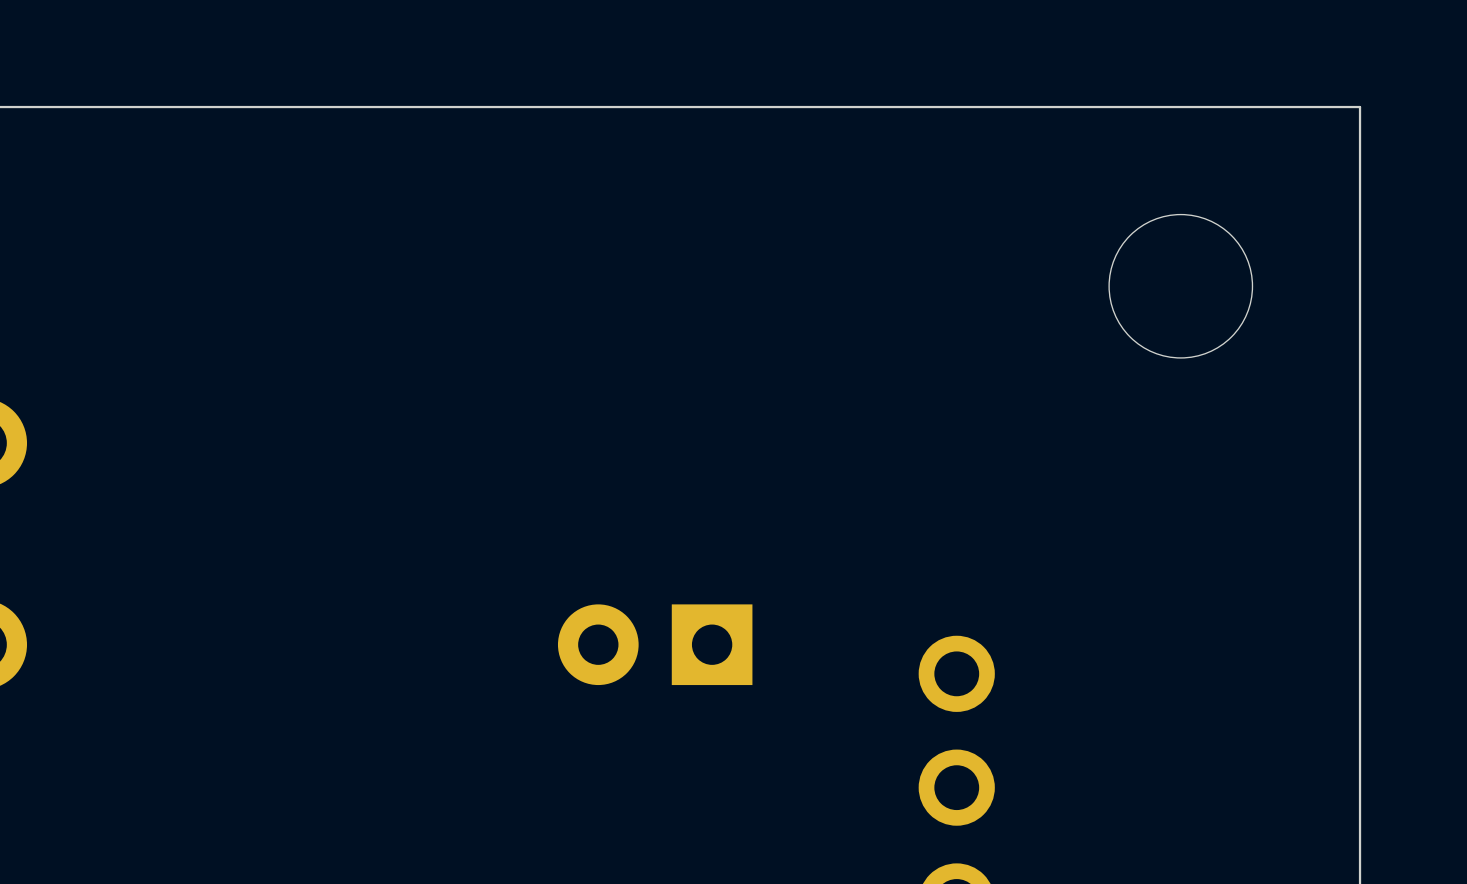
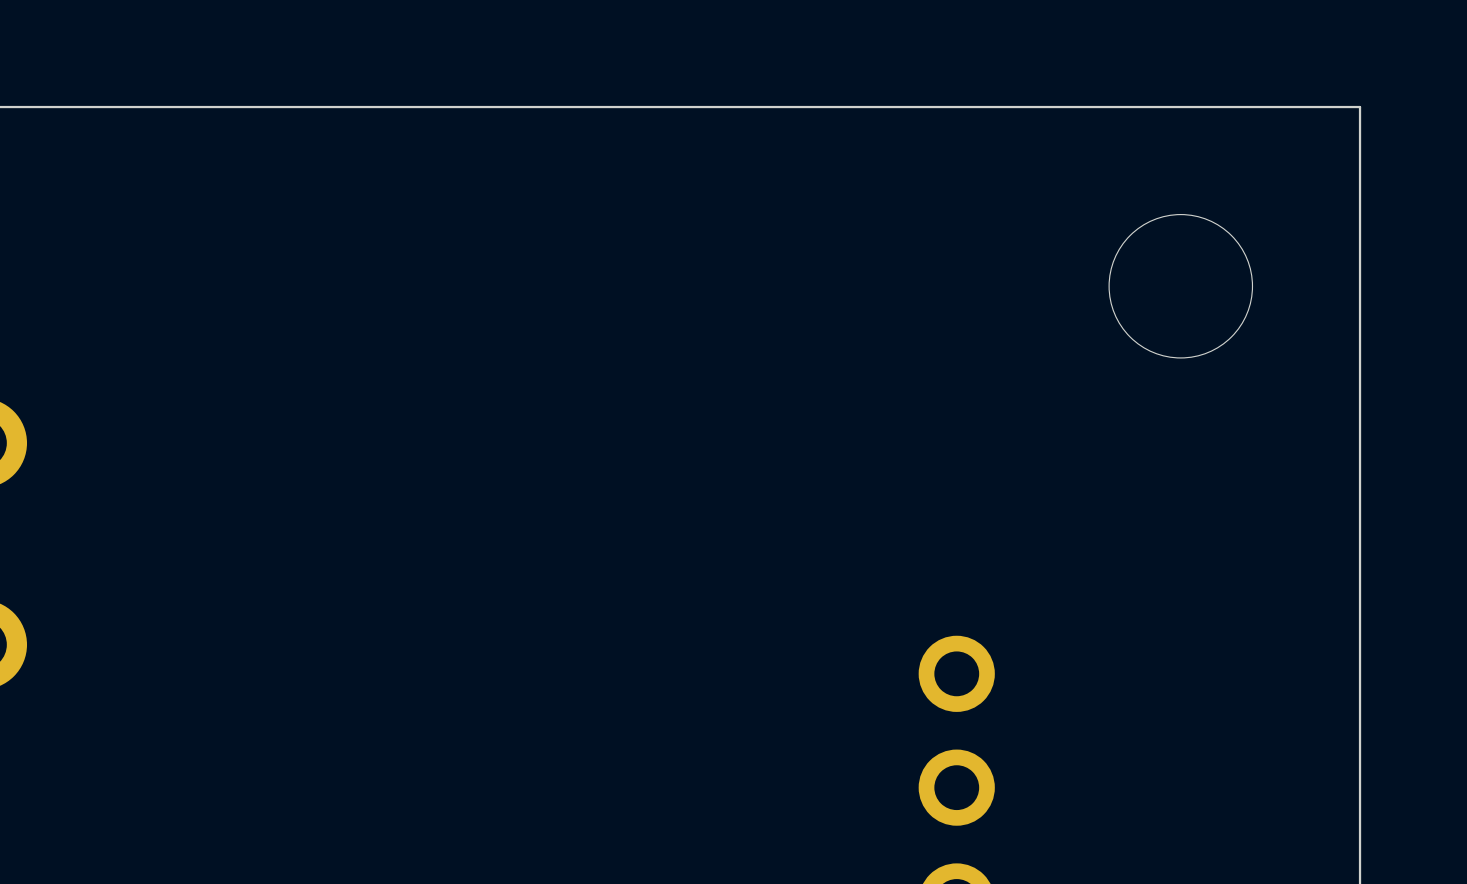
part: (655, 644) -> none

